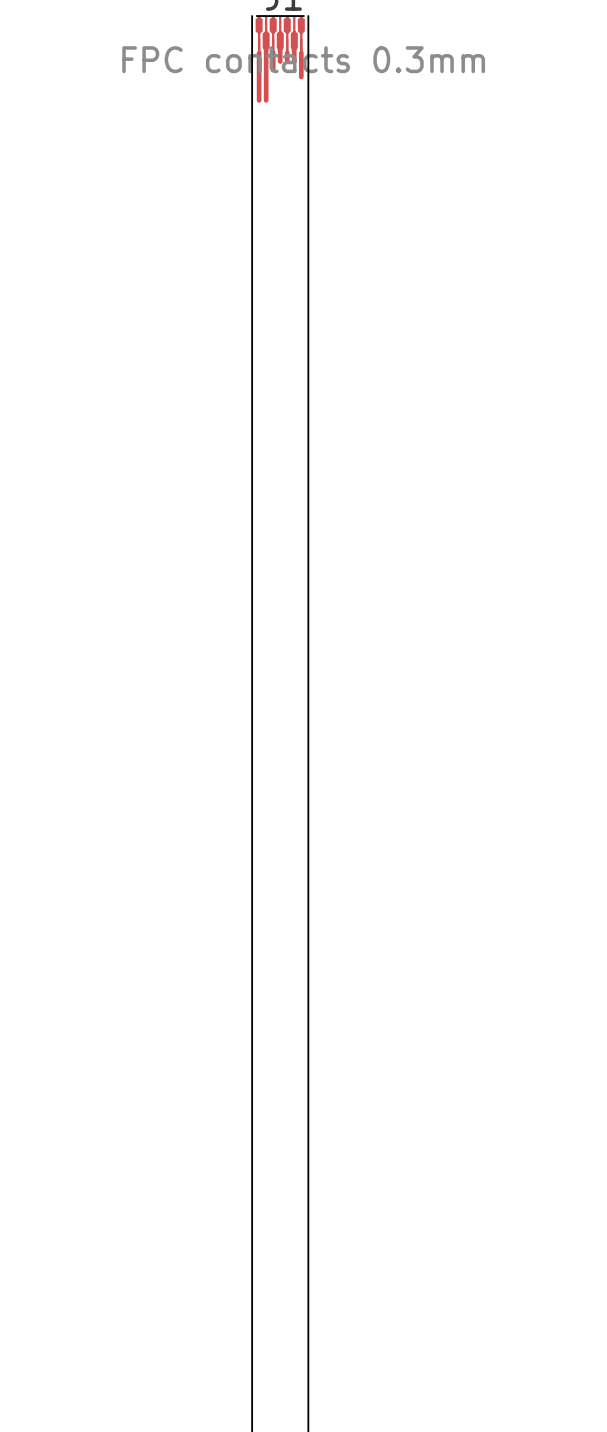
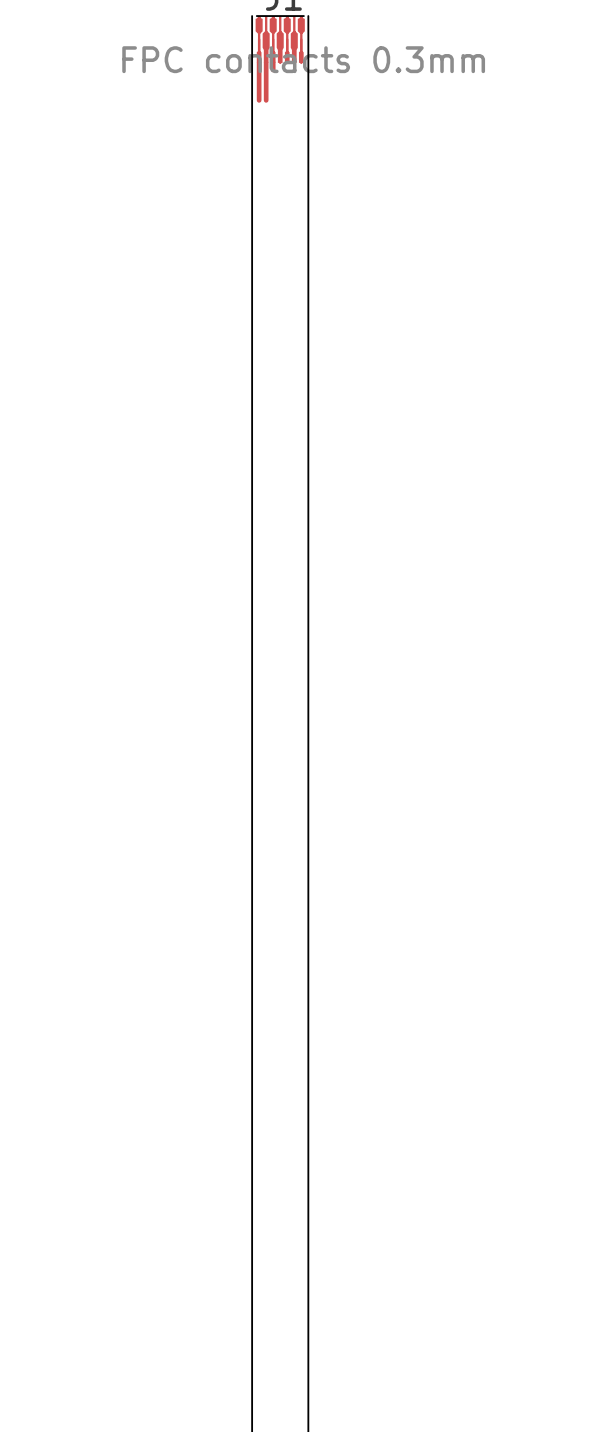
track: (301, 62) (301, 76) -> none

